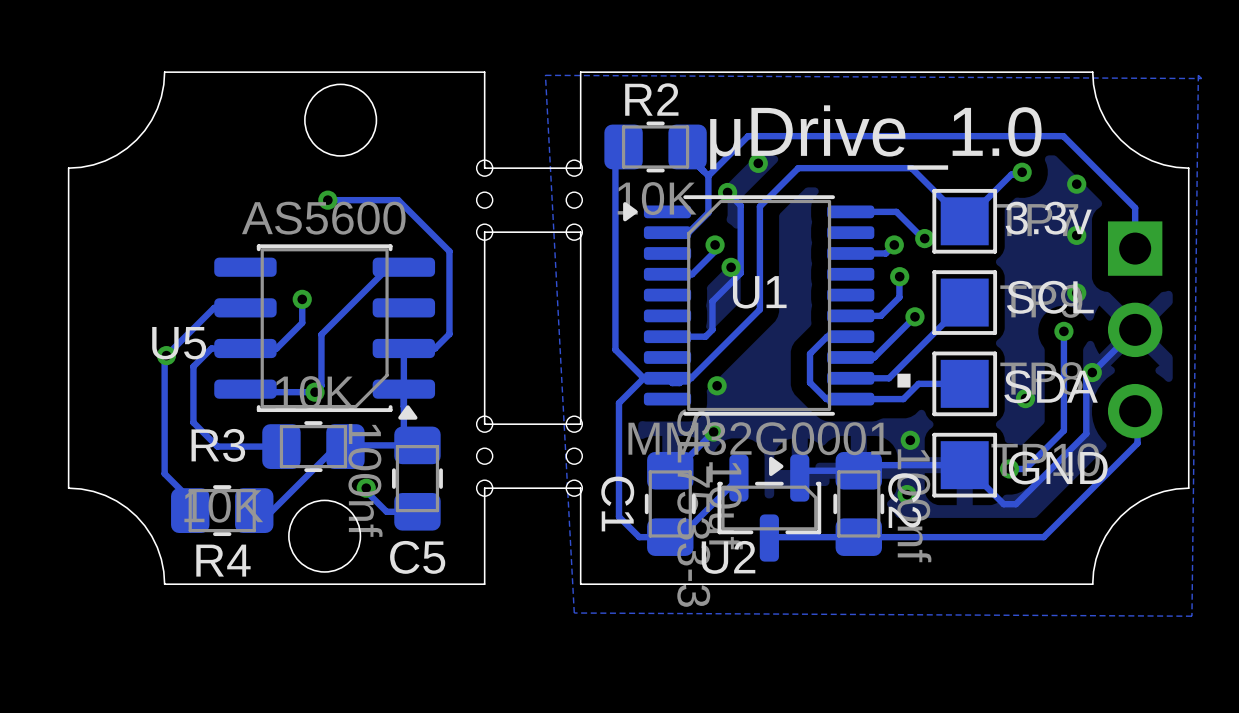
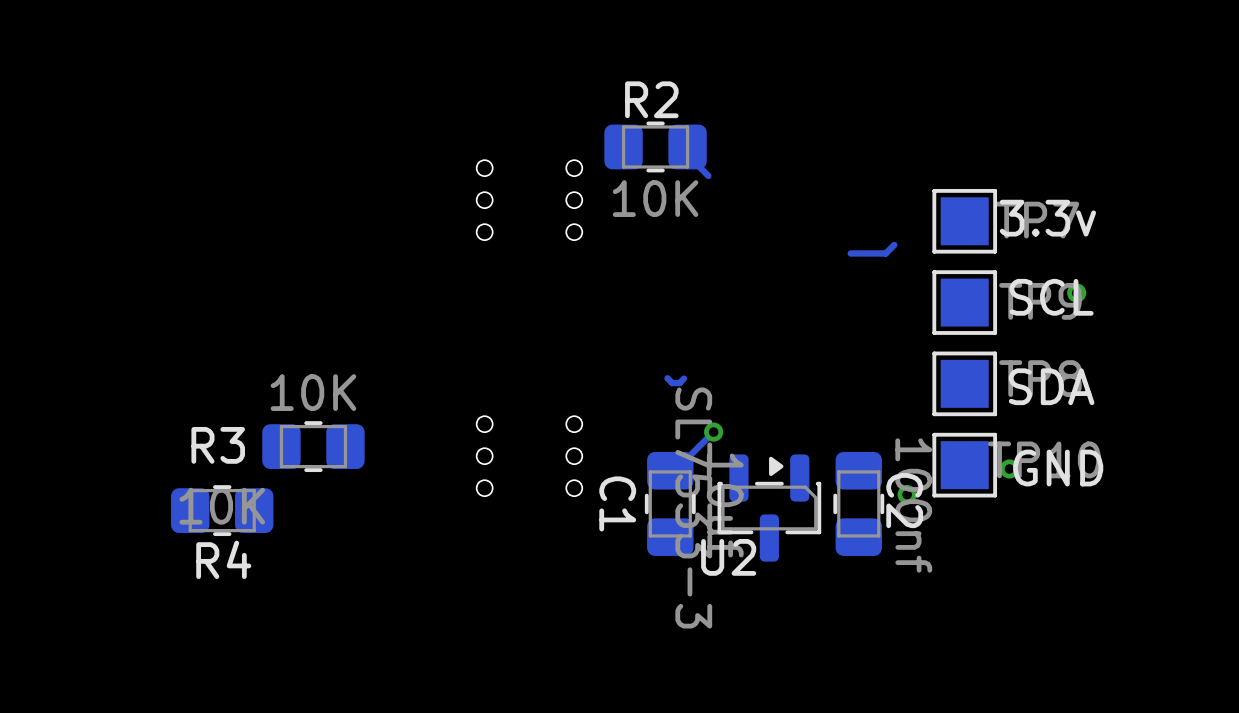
board edge: (1092, 72) (580, 72) (580, 168) (484, 168) (484, 72) (164, 72) (163, 84) (157, 108) (144, 130) (136, 140) (127, 148) (105, 160) (81, 167) (68, 168) (68, 488) (81, 489) (105, 495) (116, 501) (136, 516) (144, 525) (157, 547) (161, 559) (164, 584) (484, 584) (484, 488) (580, 488) (580, 584) (1092, 584) (1096, 559) (1100, 547) (1112, 525) (1120, 516) (1140, 501) (1152, 495) (1176, 489) (1188, 488) (1188, 168) (1163, 164) (1152, 160) (1130, 148) (1120, 140) (1112, 130) (1100, 108) (1096, 97) (1092, 72) -> none
zone outline: (1198, 75) (1191, 616) (574, 613) (545, 75) (1201, 78) (1198, 75) -> none
round board edge: [304, 83, 378, 157] -> none
text: μDrive_1.0 (875, 137) -> none
track: (615, 146) (615, 349) (643, 378) -> none
via: (758, 163) -> none
track: (1022, 172) (1022, 174) (1011, 174) (964, 221) (911, 168) (798, 168) (759, 206) (759, 309) (691, 378) (643, 378) (618, 403) (618, 516) (639, 537) (679, 537) (738, 478) -> none
via: (1022, 172) -> none
via: (1076, 184) -> none
track: (727, 192) (740, 205) (740, 273) -> none
via: (727, 192) -> none
track: (327, 200) (398, 200) (449, 251) (449, 334) (435, 348) (403, 348) (403, 431) (417, 445) (354, 445) (345, 454) -> none
via: (327, 200) -> none
track: (850, 211) (896, 211) (924, 240) (924, 244) -> none
board edge: (580, 232) (580, 424) (484, 424) (484, 232) (580, 232) -> none
track: (667, 232) (688, 232) (708, 212) (708, 175) (748, 136) (1063, 136) (1135, 207) (1135, 248) -> none
via: (1076, 235) -> none
via: (924, 238) -> none
track: (715, 244) (715, 251) (692, 274) (667, 274) -> none
via: (715, 244) -> none
via: (894, 244) -> none
track: (403, 267) (388, 267) (321, 334) (321, 385) (315, 392) (248, 392) (245, 389) -> none
via: (731, 267) -> none
track: (740, 273) (712, 301) (712, 329) (705, 336) (667, 336) -> none
track: (899, 276) (899, 297) (880, 315) (850, 315) -> none
via: (899, 276) -> none
track: (302, 299) (302, 322) (276, 348) (211, 348) (193, 366) (193, 422) (217, 446) (281, 446) -> none
via: (302, 299) -> none
track: (964, 302) (889, 378) (850, 378) -> none
U1: MM32G0001 (748, 305) -> none
track: (245, 307) (214, 307) (164, 357) (164, 473) (201, 510) -> none
track: (914, 316) (874, 357) (850, 357) -> none
via: (914, 316) -> none
track: (1135, 329) (1086, 378) (1086, 433) (1015, 504) (1003, 504) (964, 465) -> none
part: (1135, 329) -> none
track: (1063, 331) (1063, 430) (1025, 468) (1009, 468) -> none
via: (1063, 331) -> none
U5: AS5600 (324, 332) -> none
track: (850, 336) (827, 336) (810, 353) (810, 382) (826, 399) (903, 399) (918, 383) (964, 383) -> none
via: (166, 355) -> none
via: (1092, 372) -> none
text: . (903, 380) -> none
via: (717, 385) -> none
via: (315, 392) -> none
via: (1025, 398) -> none
track: (1135, 411) (1137, 413) (1137, 443) (1043, 537) (769, 538) -> none
via: (910, 440) -> none
track: (345, 446) (336, 446) (269, 513) -> none
track: (964, 465) (864, 465) (858, 470) (807, 470) (799, 478) -> none
C5: 100nf (417, 478) -> none
track: (366, 488) (366, 491) (386, 511) (417, 511) -> none
via: (366, 488) -> none
round board edge: [288, 499, 362, 573] -> none

